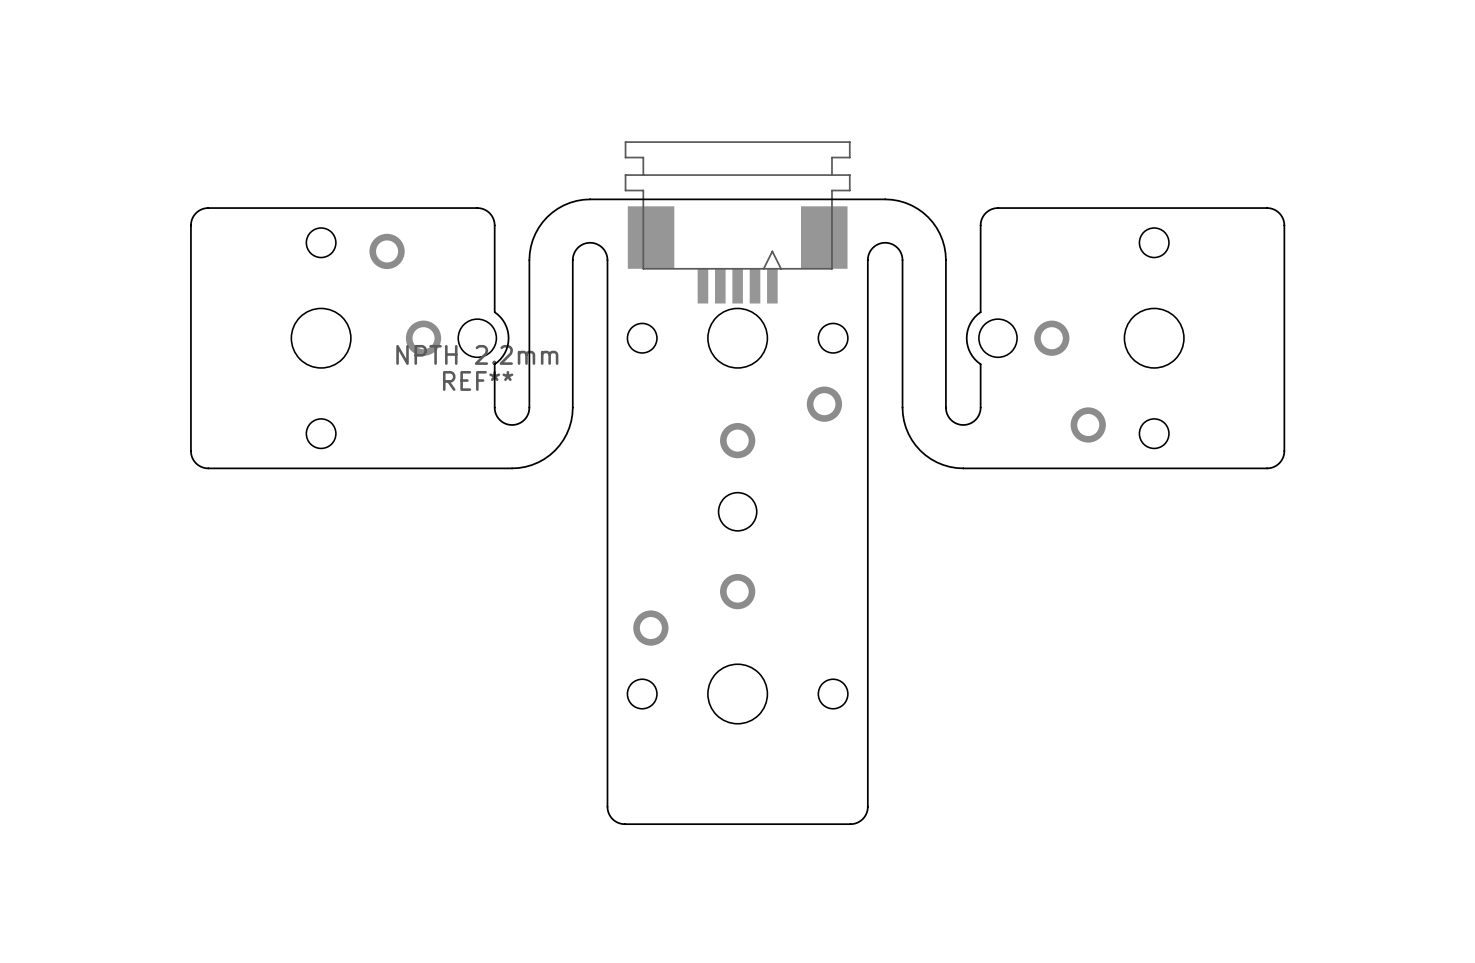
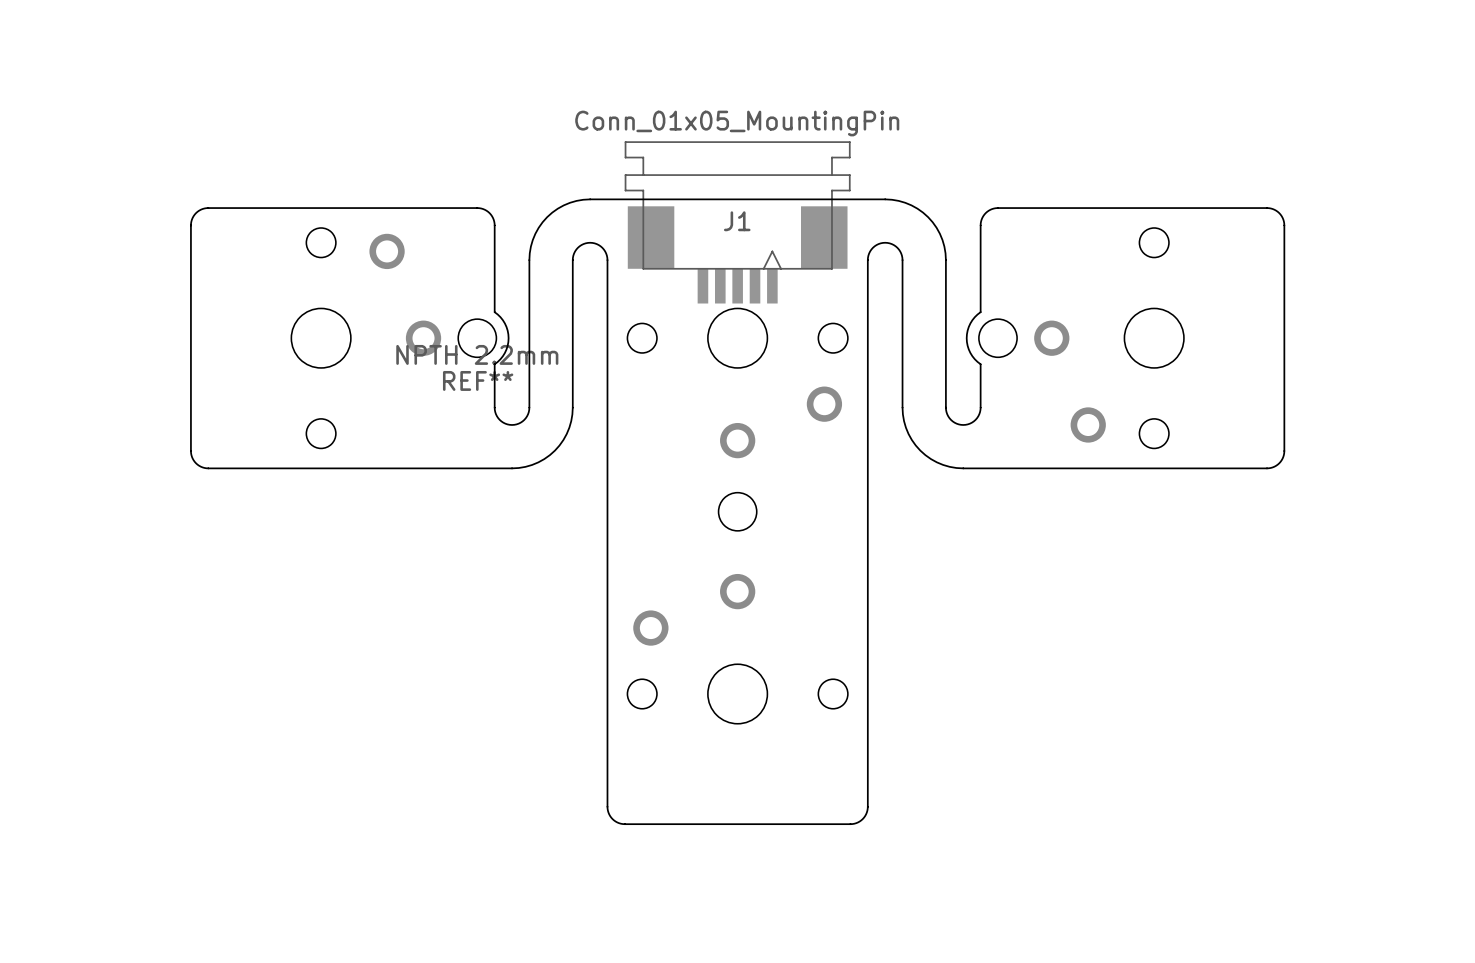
J1 value: none -> Conn_01x05_MountingPin (737, 123)
J1 name: none -> J1 (737, 221)

